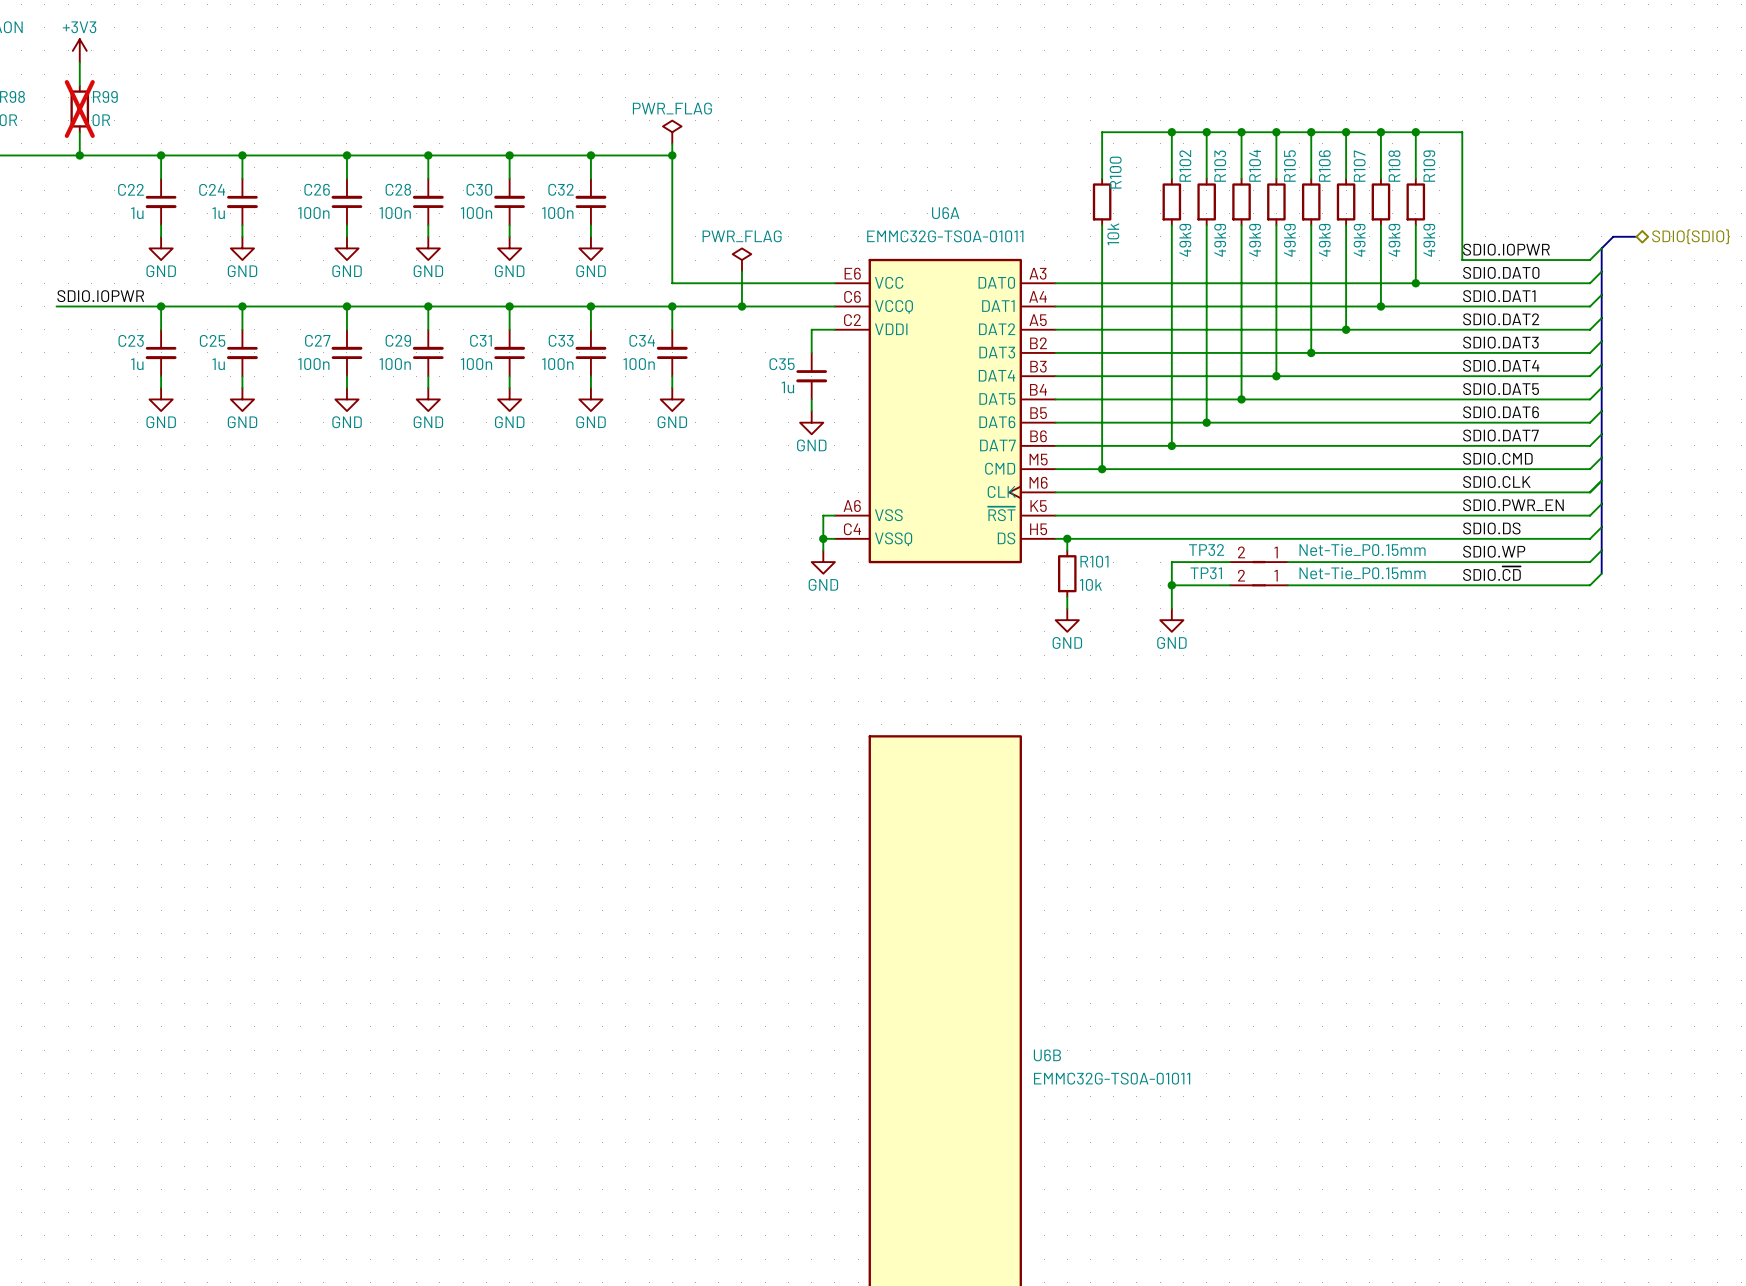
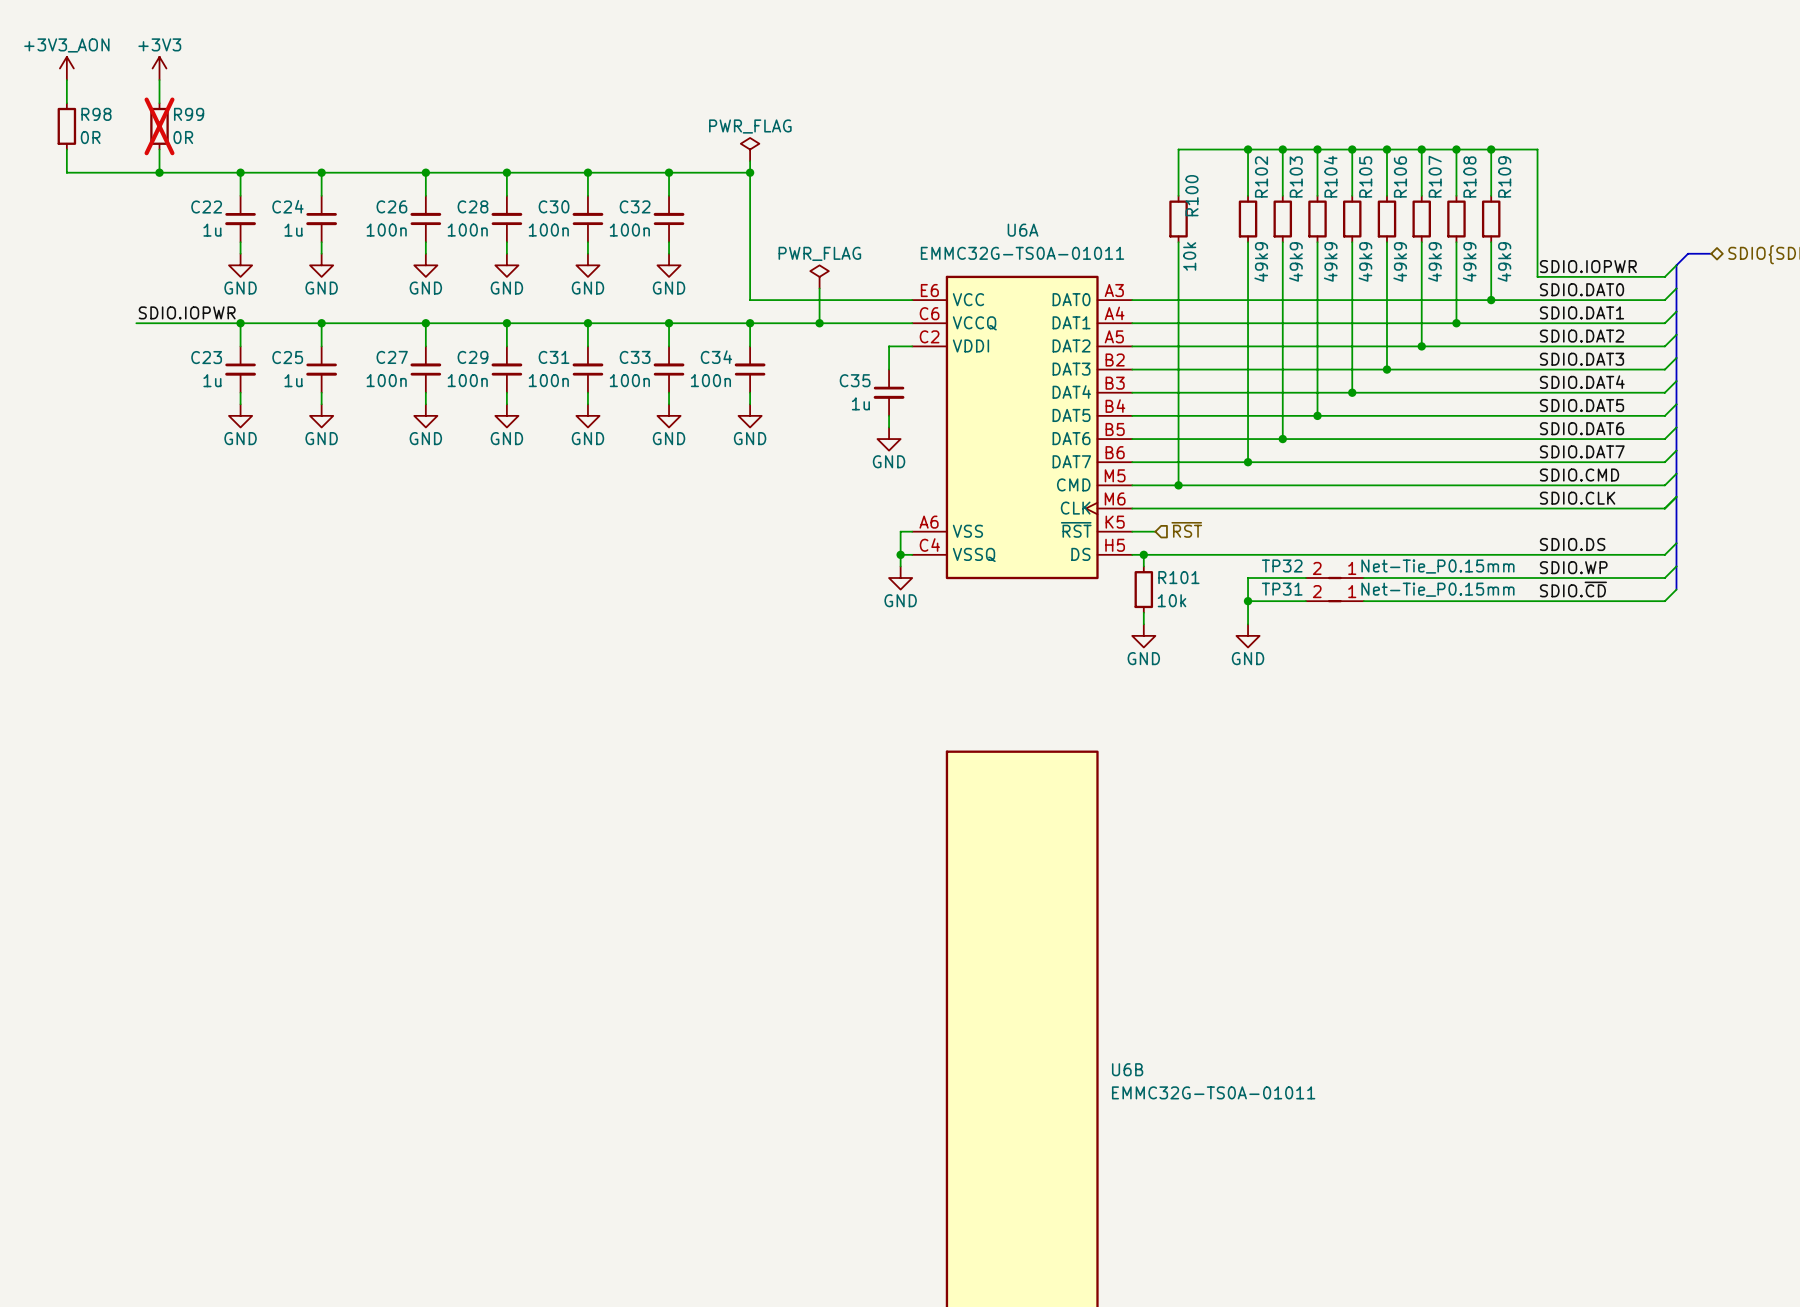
wire: (1601, 503) (1590, 515) (1078, 515) -> none
label: SDIO.PWR_EN (1513, 505) -> none
hierarchical label: none -> ~{RST} (1186, 529)

